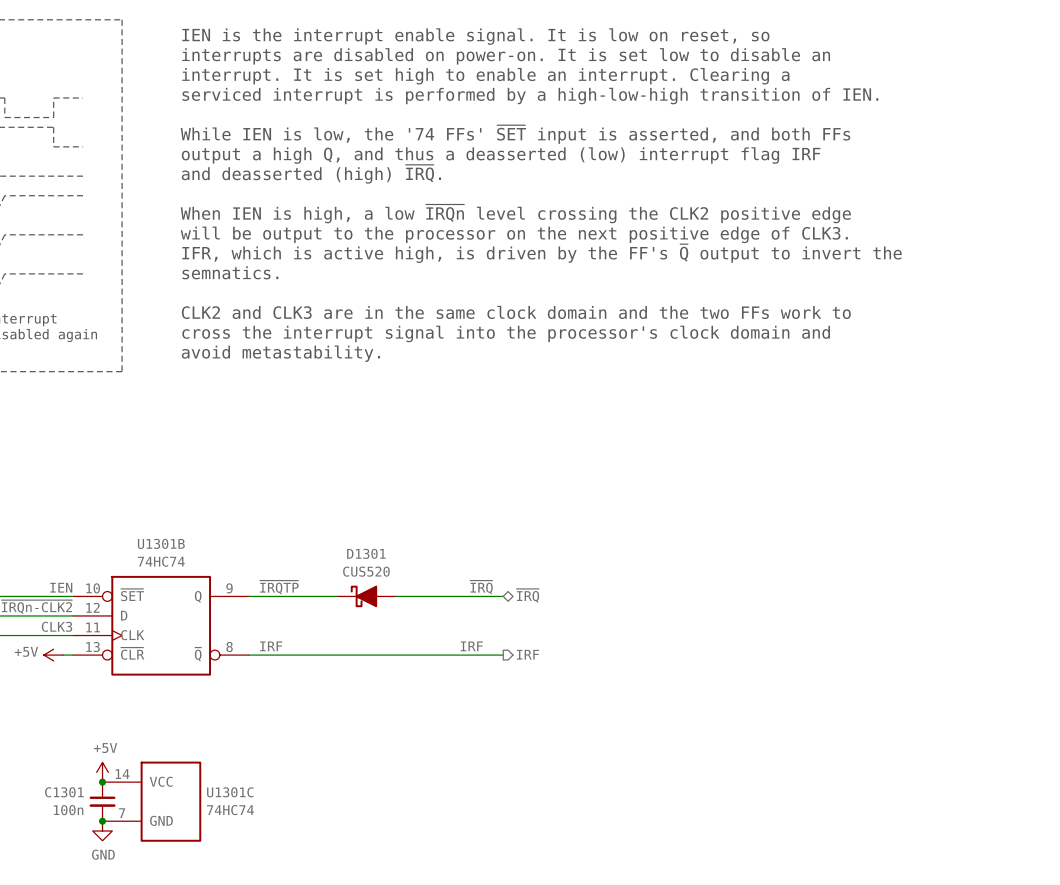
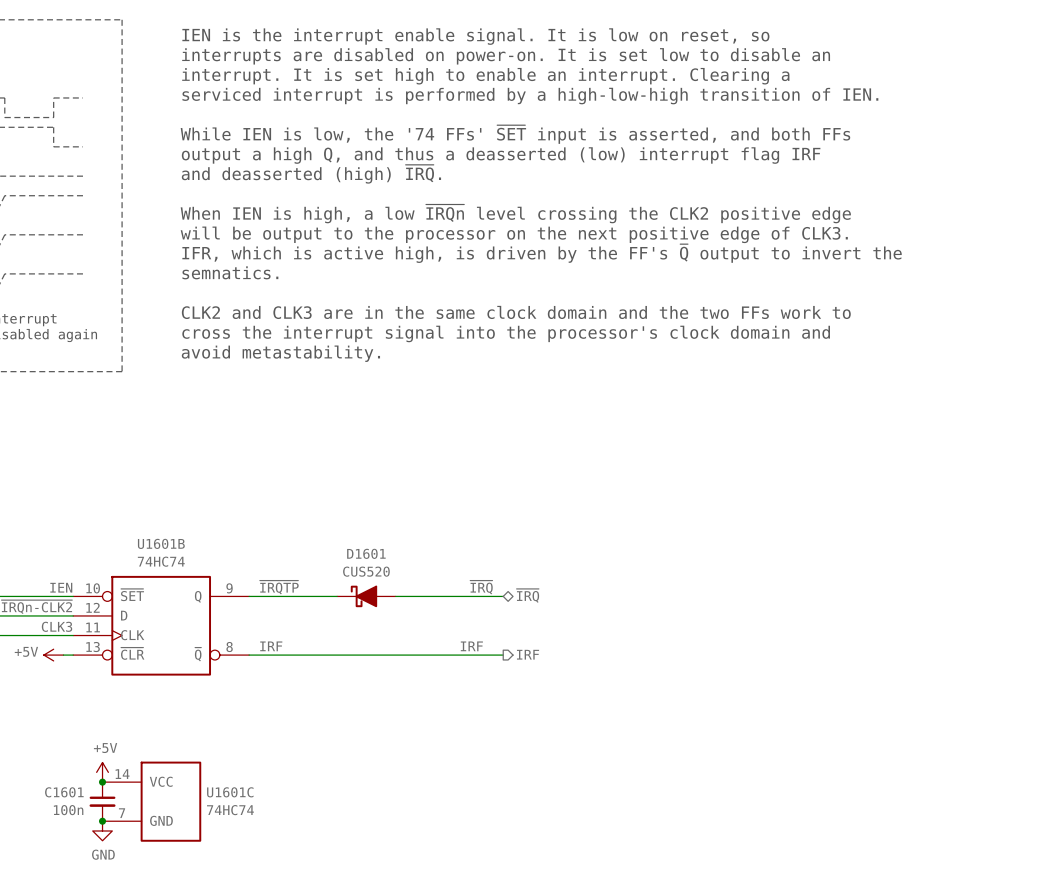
U1301B name: U1301B (161, 543) -> U1601B (161, 543)
D1301 name: D1301 (366, 553) -> D1601 (366, 553)
C1301 name: C1301 (64, 792) -> C1601 (64, 792)
U1301C name: U1301C (230, 792) -> U1601C (230, 792)

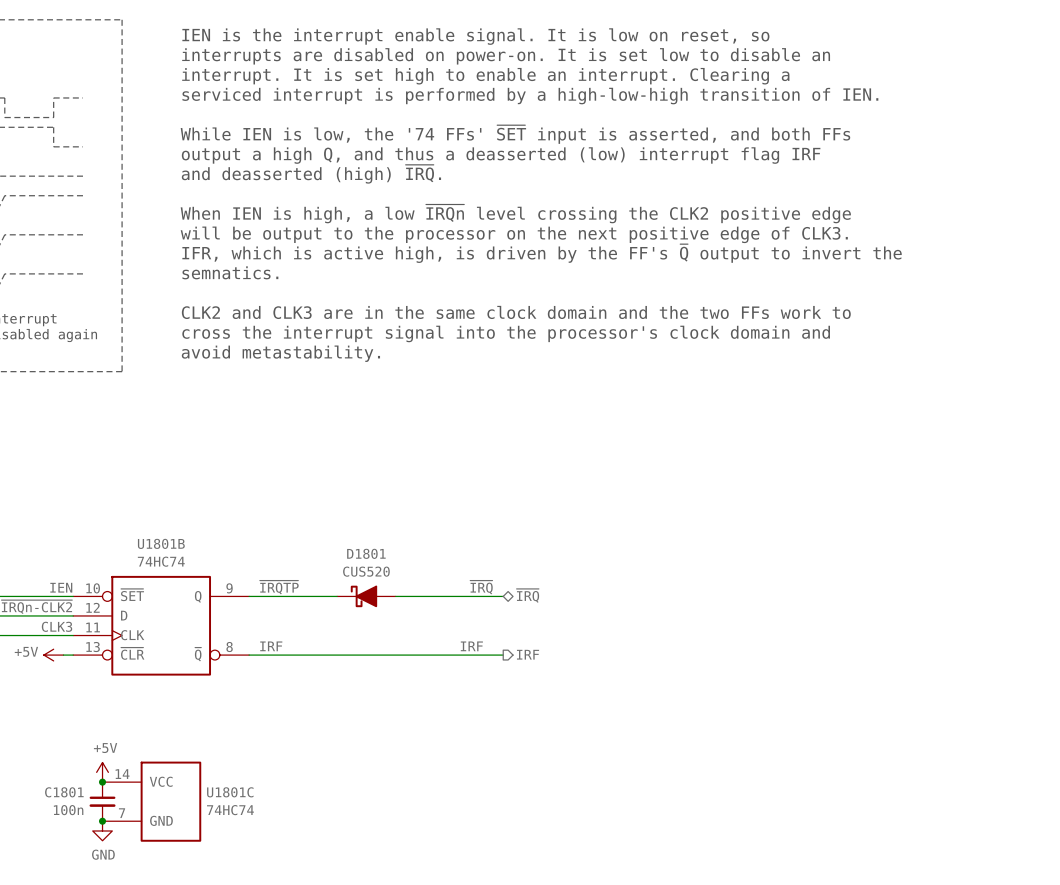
U1601B name: U1601B (161, 543) -> U1801B (161, 543)
D1601 name: D1601 (366, 553) -> D1801 (366, 553)
C1601 name: C1601 (64, 792) -> C1801 (64, 792)
U1601C name: U1601C (230, 792) -> U1801C (230, 792)

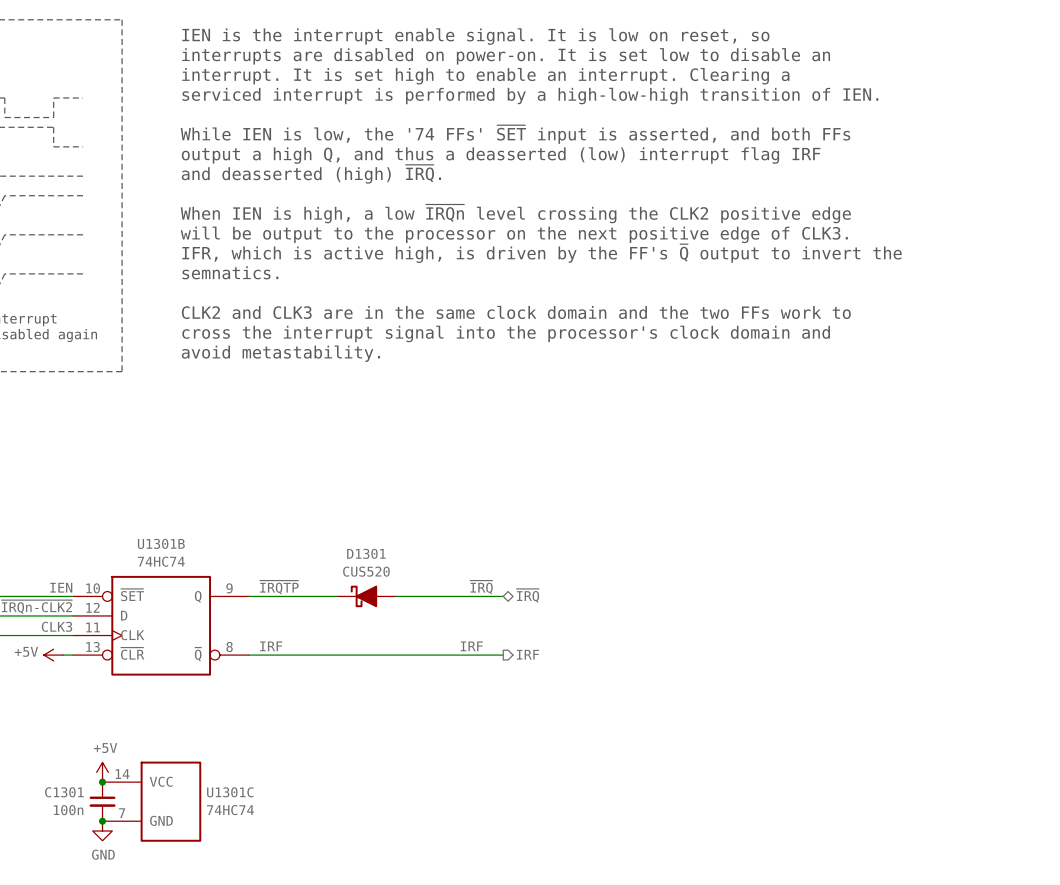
U1801B name: U1801B (161, 543) -> U1301B (161, 543)
D1801 name: D1801 (366, 553) -> D1301 (366, 553)
C1801 name: C1801 (64, 792) -> C1301 (64, 792)
U1801C name: U1801C (230, 792) -> U1301C (230, 792)

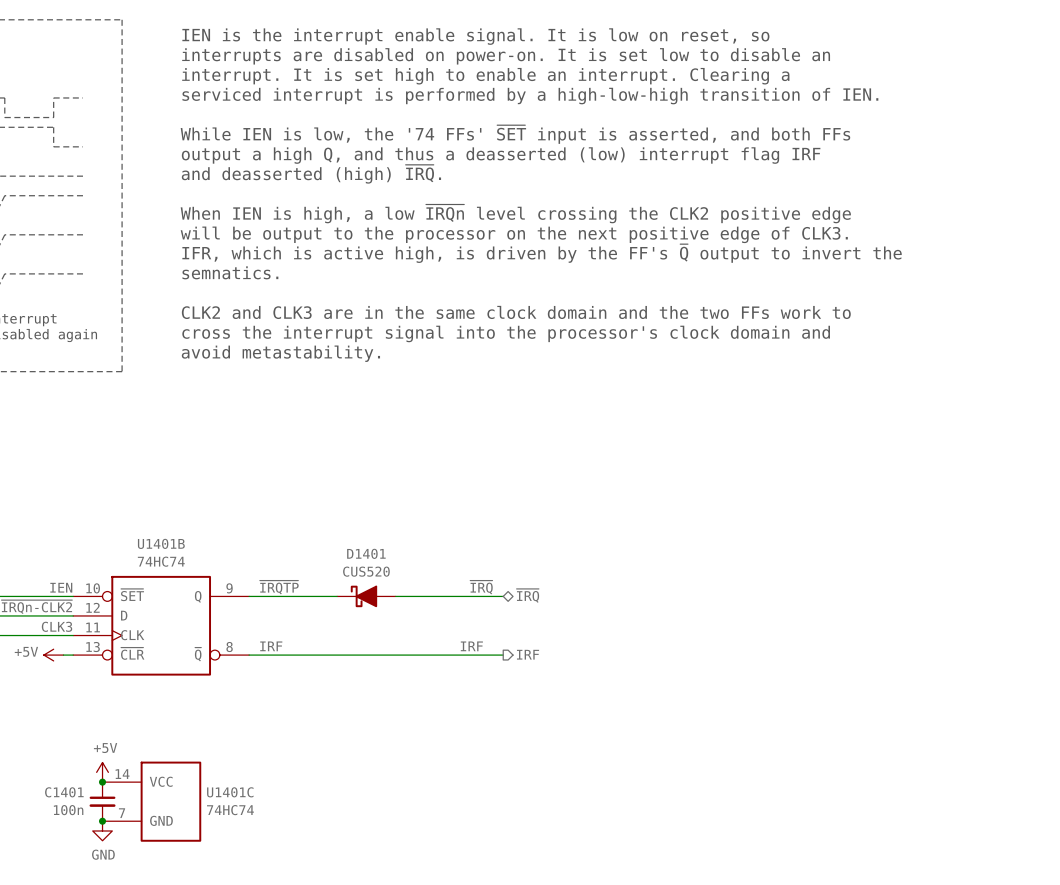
U1301B name: U1301B (161, 543) -> U1401B (161, 543)
D1301 name: D1301 (366, 553) -> D1401 (366, 553)
C1301 name: C1301 (64, 792) -> C1401 (64, 792)
U1301C name: U1301C (230, 792) -> U1401C (230, 792)

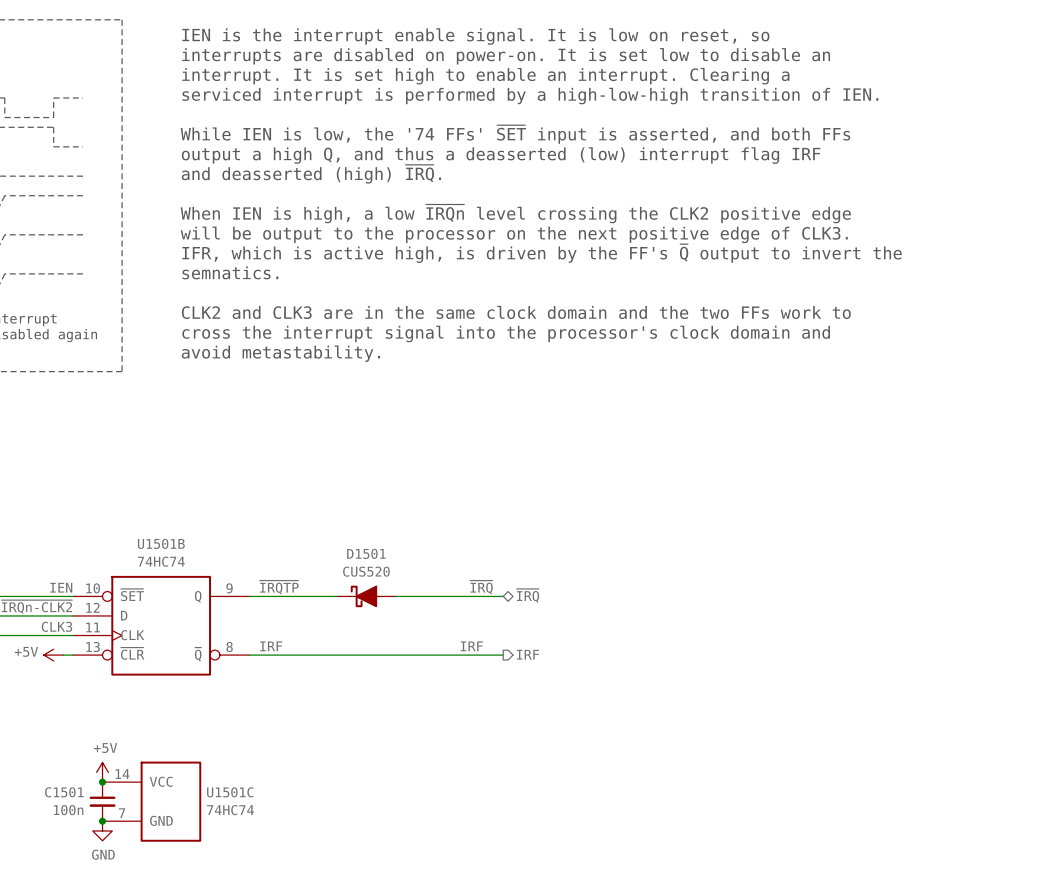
U1401B name: U1401B (161, 543) -> U1501B (161, 543)
D1401 name: D1401 (366, 553) -> D1501 (366, 553)
C1401 name: C1401 (64, 792) -> C1501 (64, 792)
U1401C name: U1401C (230, 792) -> U1501C (230, 792)

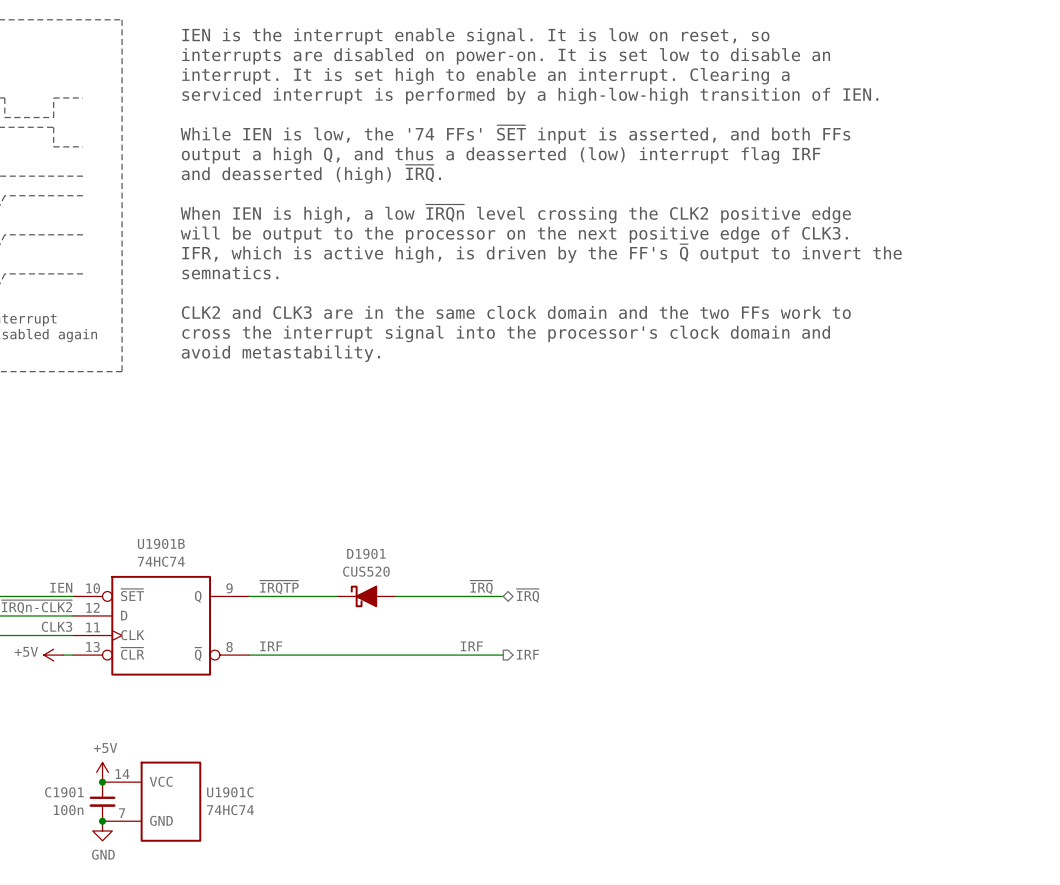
U1501B name: U1501B (161, 543) -> U1901B (161, 543)
D1501 name: D1501 (366, 553) -> D1901 (366, 553)
C1501 name: C1501 (64, 792) -> C1901 (64, 792)
U1501C name: U1501C (230, 792) -> U1901C (230, 792)

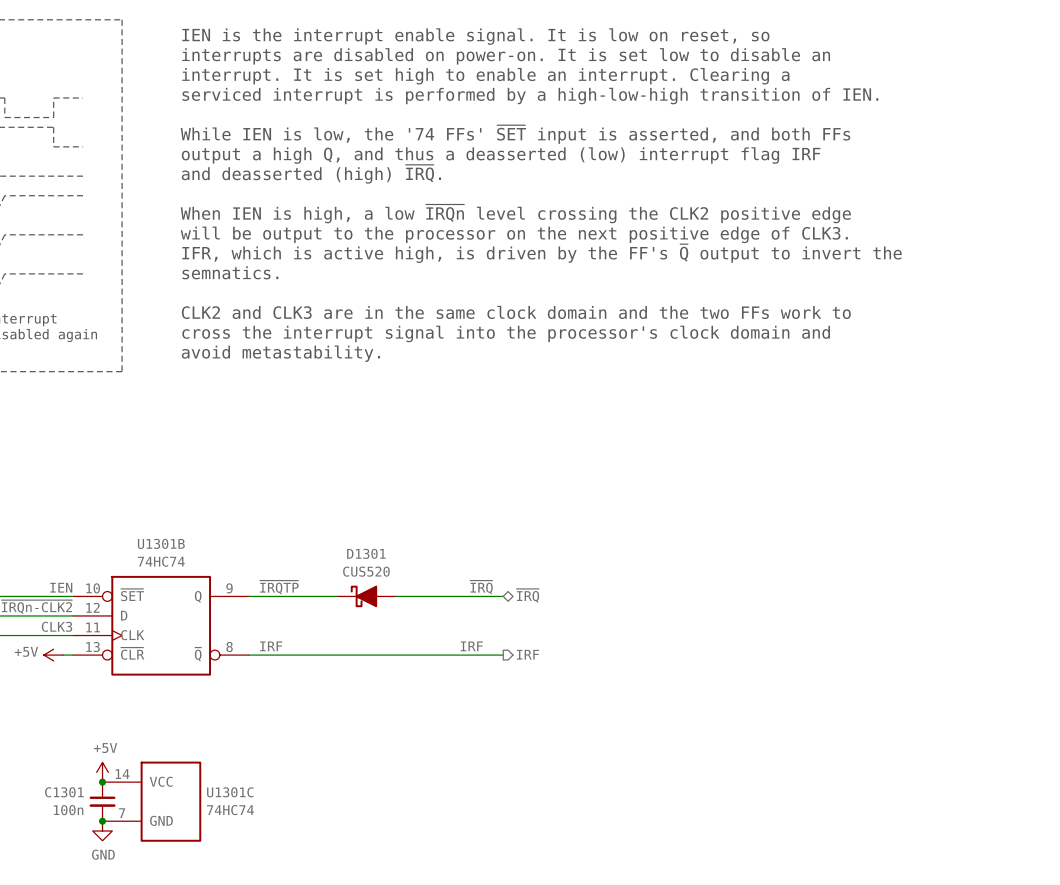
U1901B name: U1901B (161, 543) -> U1301B (161, 543)
D1901 name: D1901 (366, 553) -> D1301 (366, 553)
C1901 name: C1901 (64, 792) -> C1301 (64, 792)
U1901C name: U1901C (230, 792) -> U1301C (230, 792)

